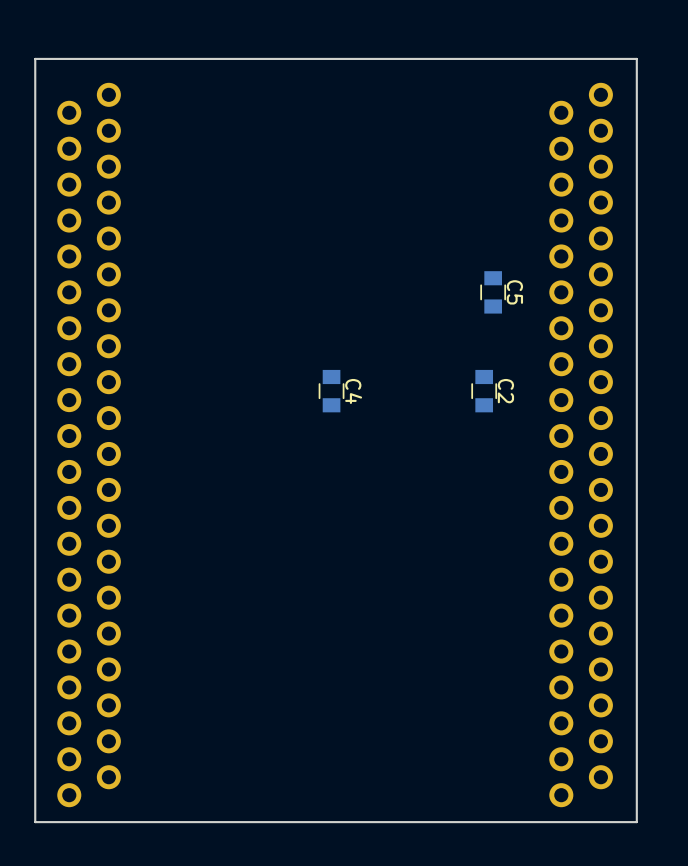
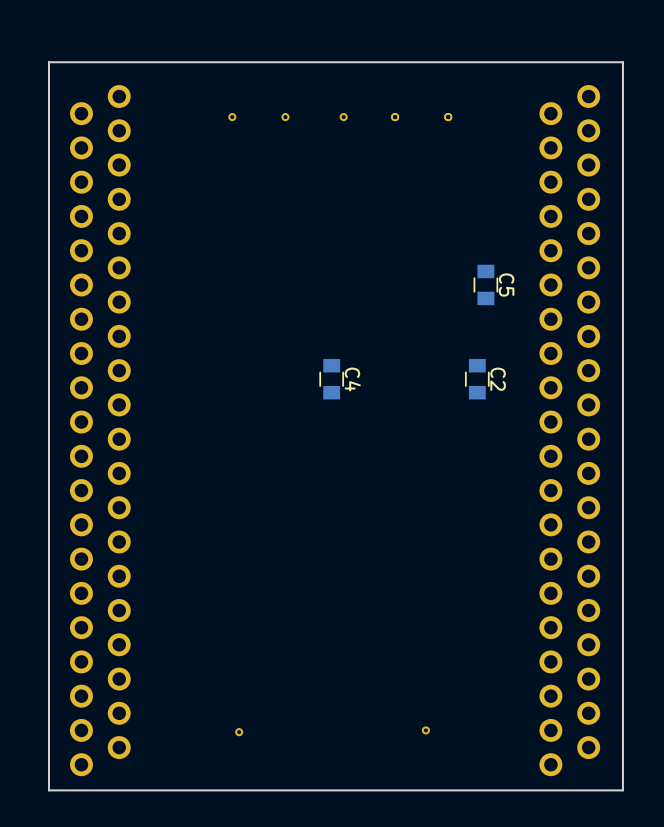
part: none -> (232, 117)
part: none -> (285, 117)
part: none -> (343, 117)
part: none -> (395, 117)
part: none -> (448, 117)
part: none -> (425, 730)
part: none -> (239, 732)

